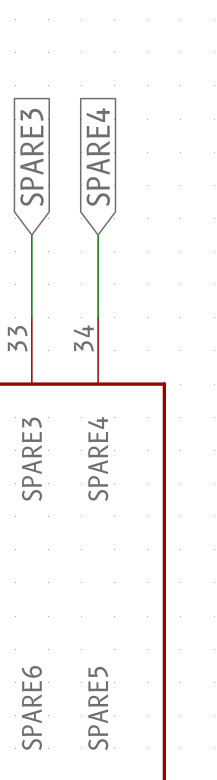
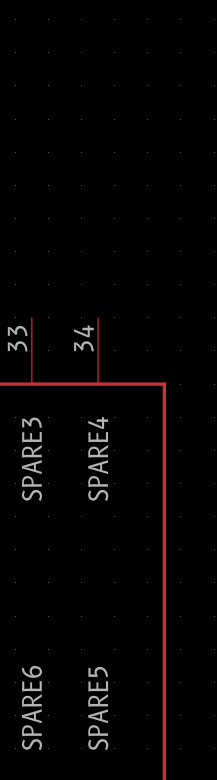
global label: SPARE3 (31, 157) -> none
global label: SPARE4 (98, 157) -> none
wire: (31, 235) (31, 317) -> none
wire: (98, 235) (98, 317) -> none

